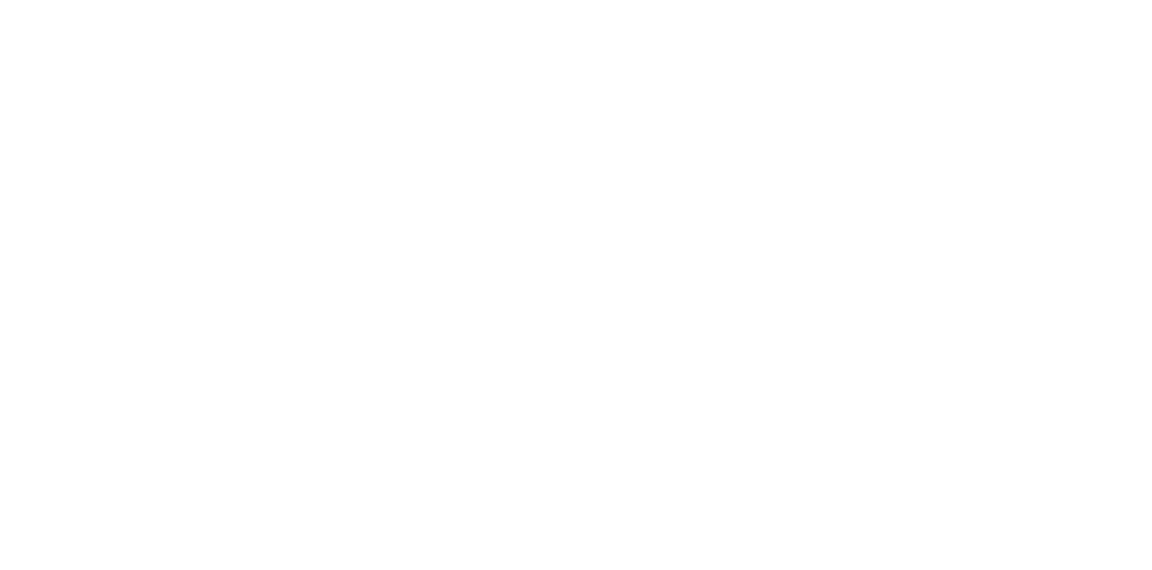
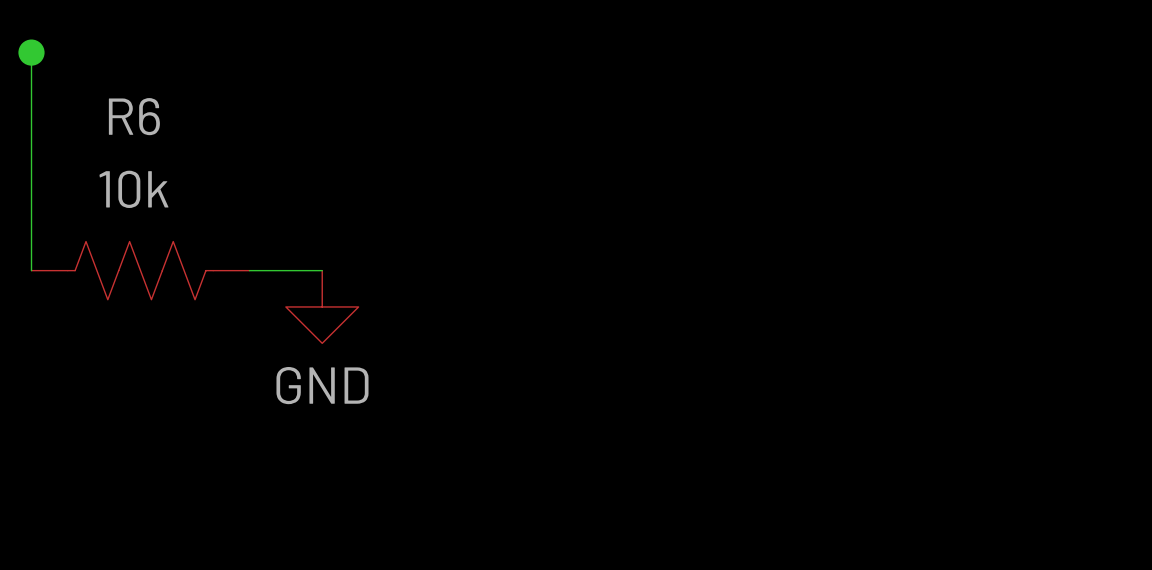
wire: none -> (31, 52) (31, 270)
junction: none -> (31, 52)
R6: none -> 10k (140, 270)
wire: none -> (249, 270) (322, 270)
power symbol: none -> GND (322, 306)

